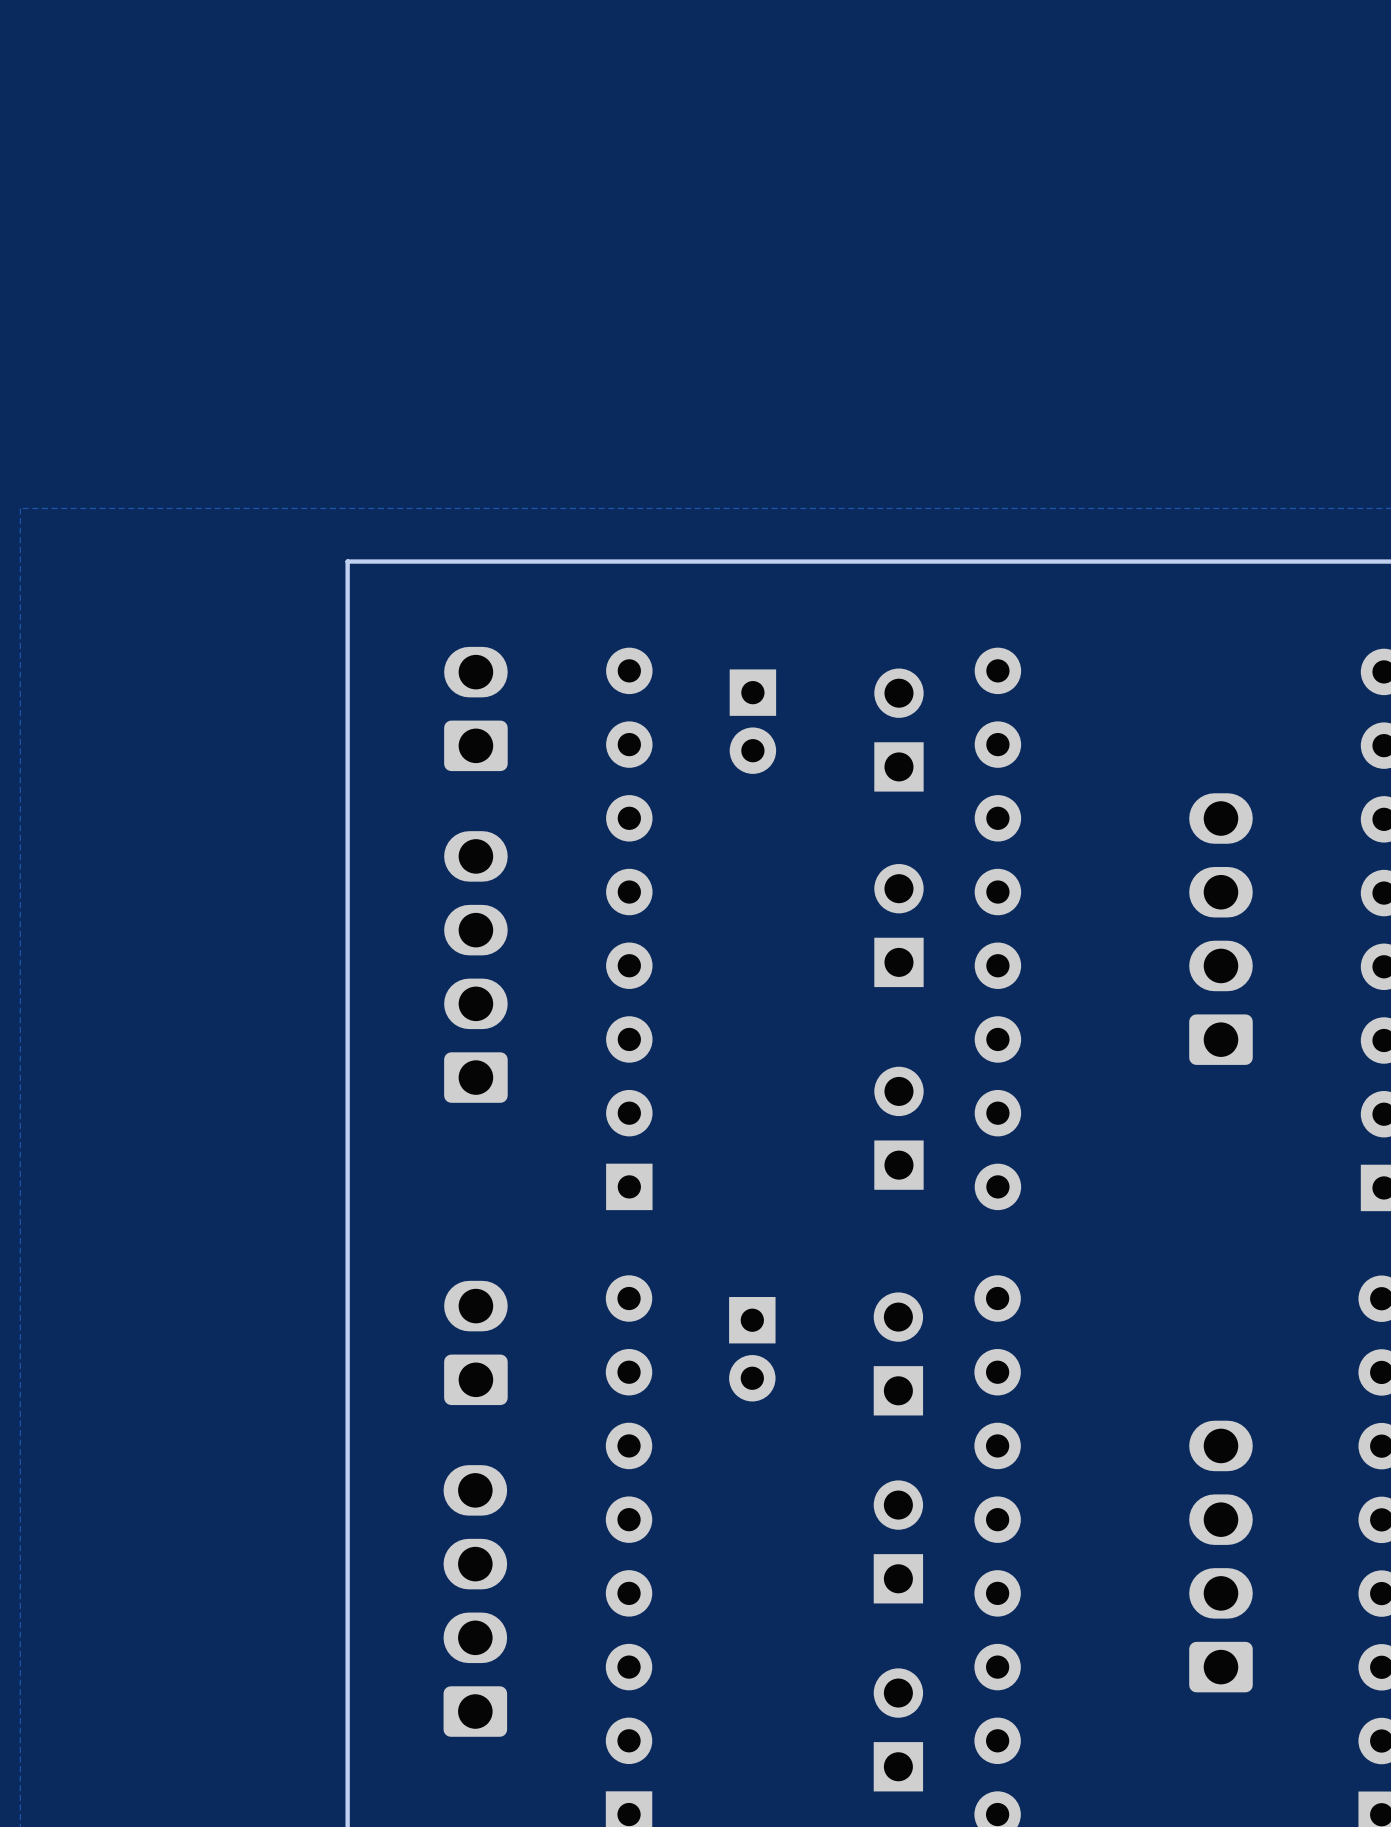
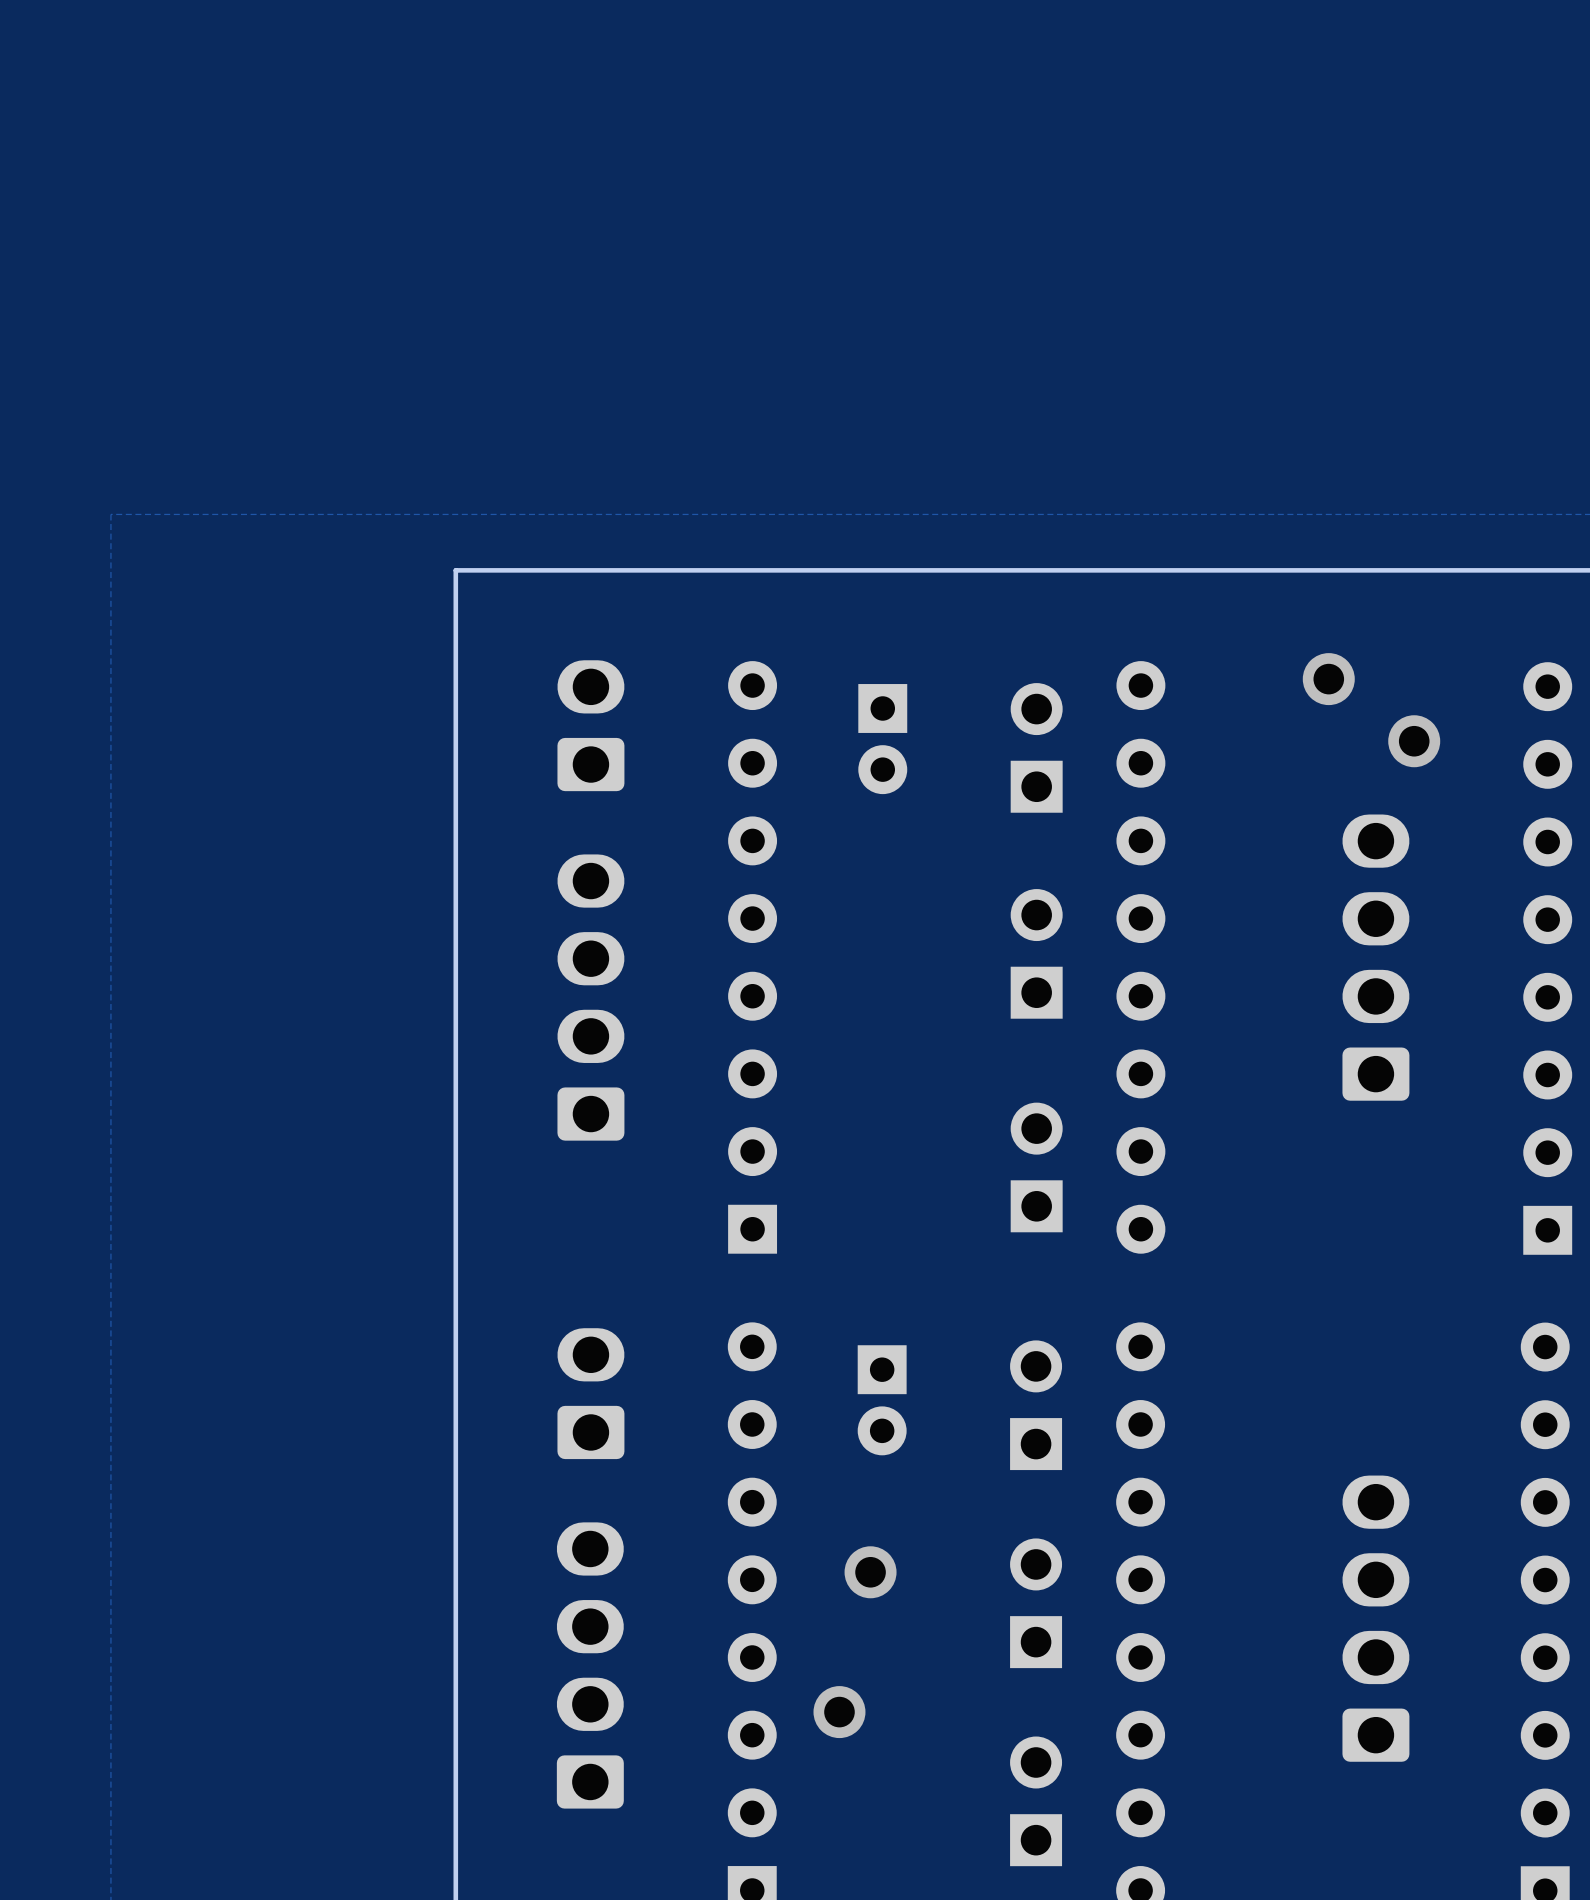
via: none -> (1328, 679)
via: none -> (1414, 741)
via: none -> (870, 1572)
via: none -> (839, 1712)

